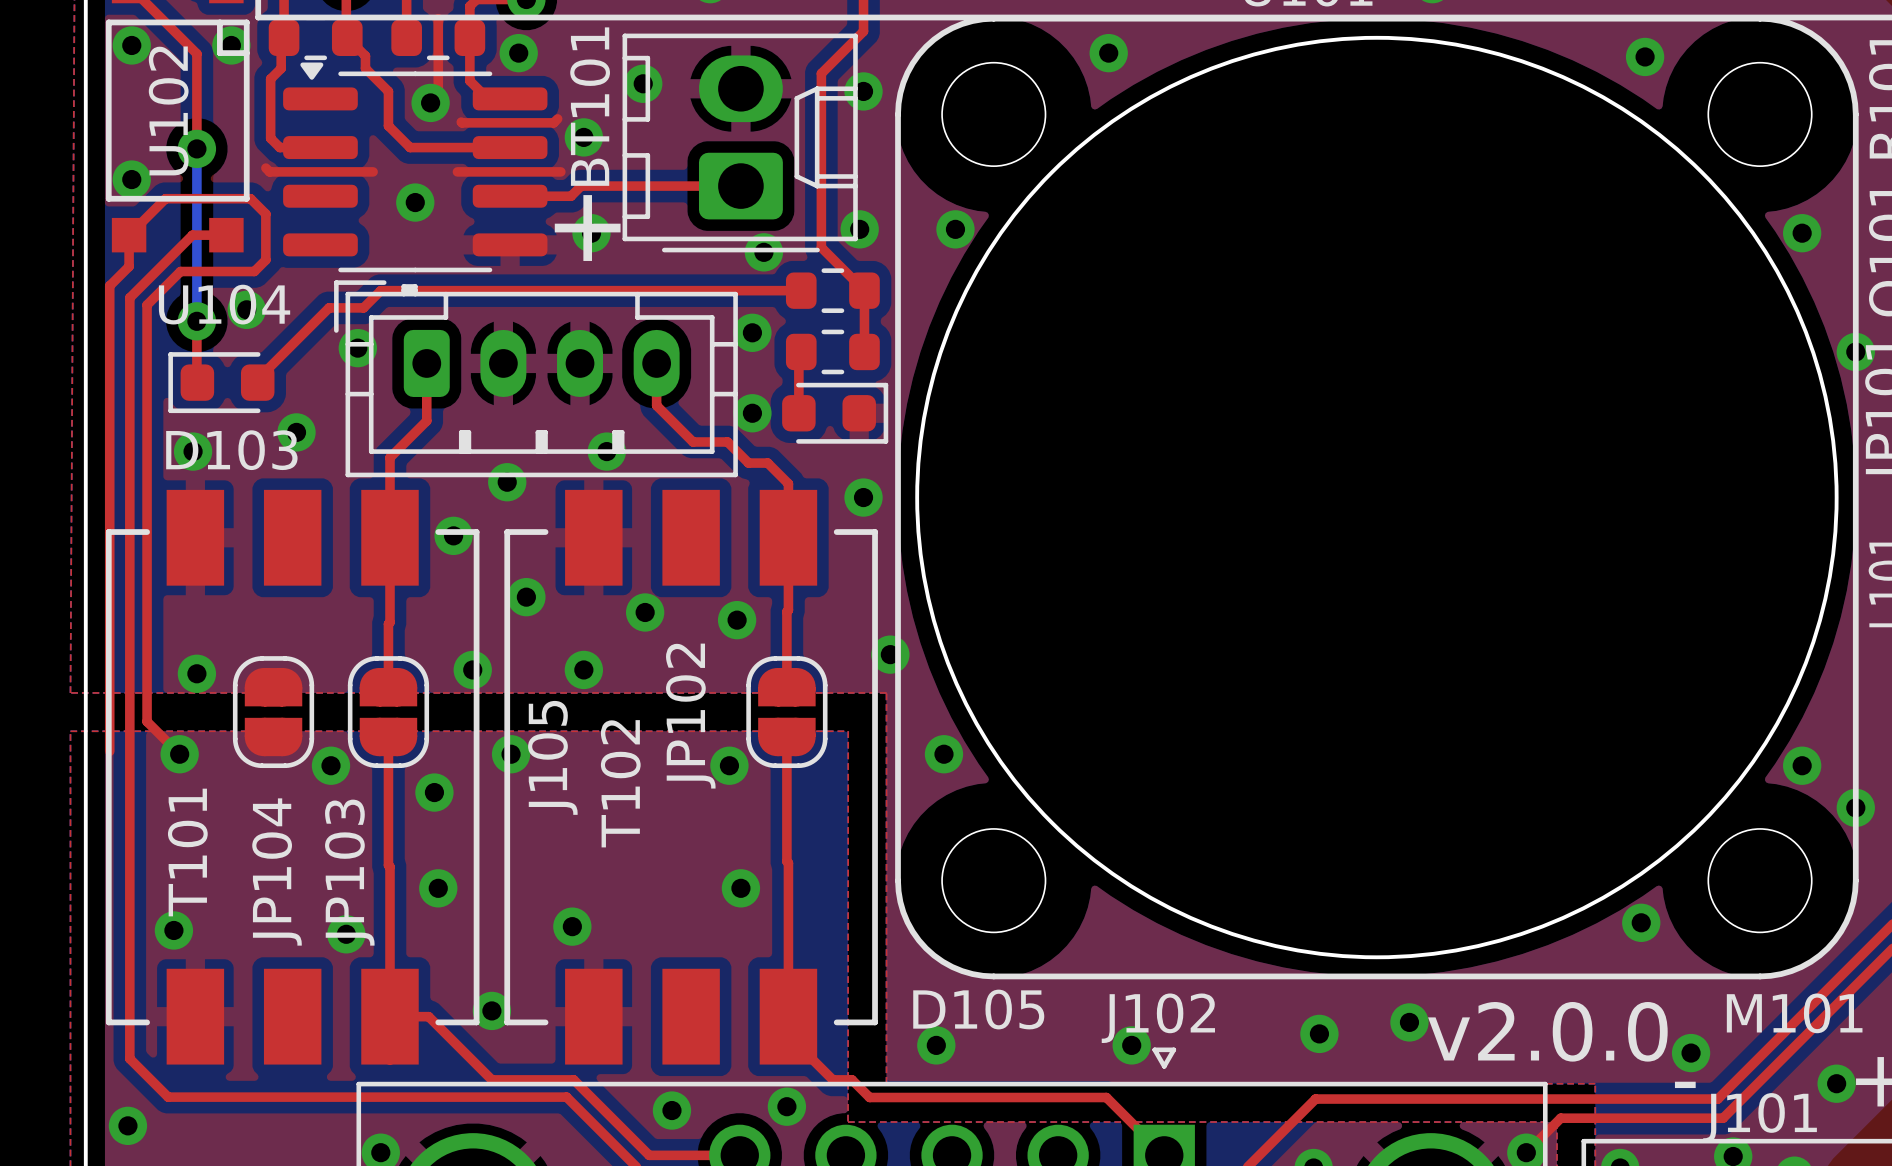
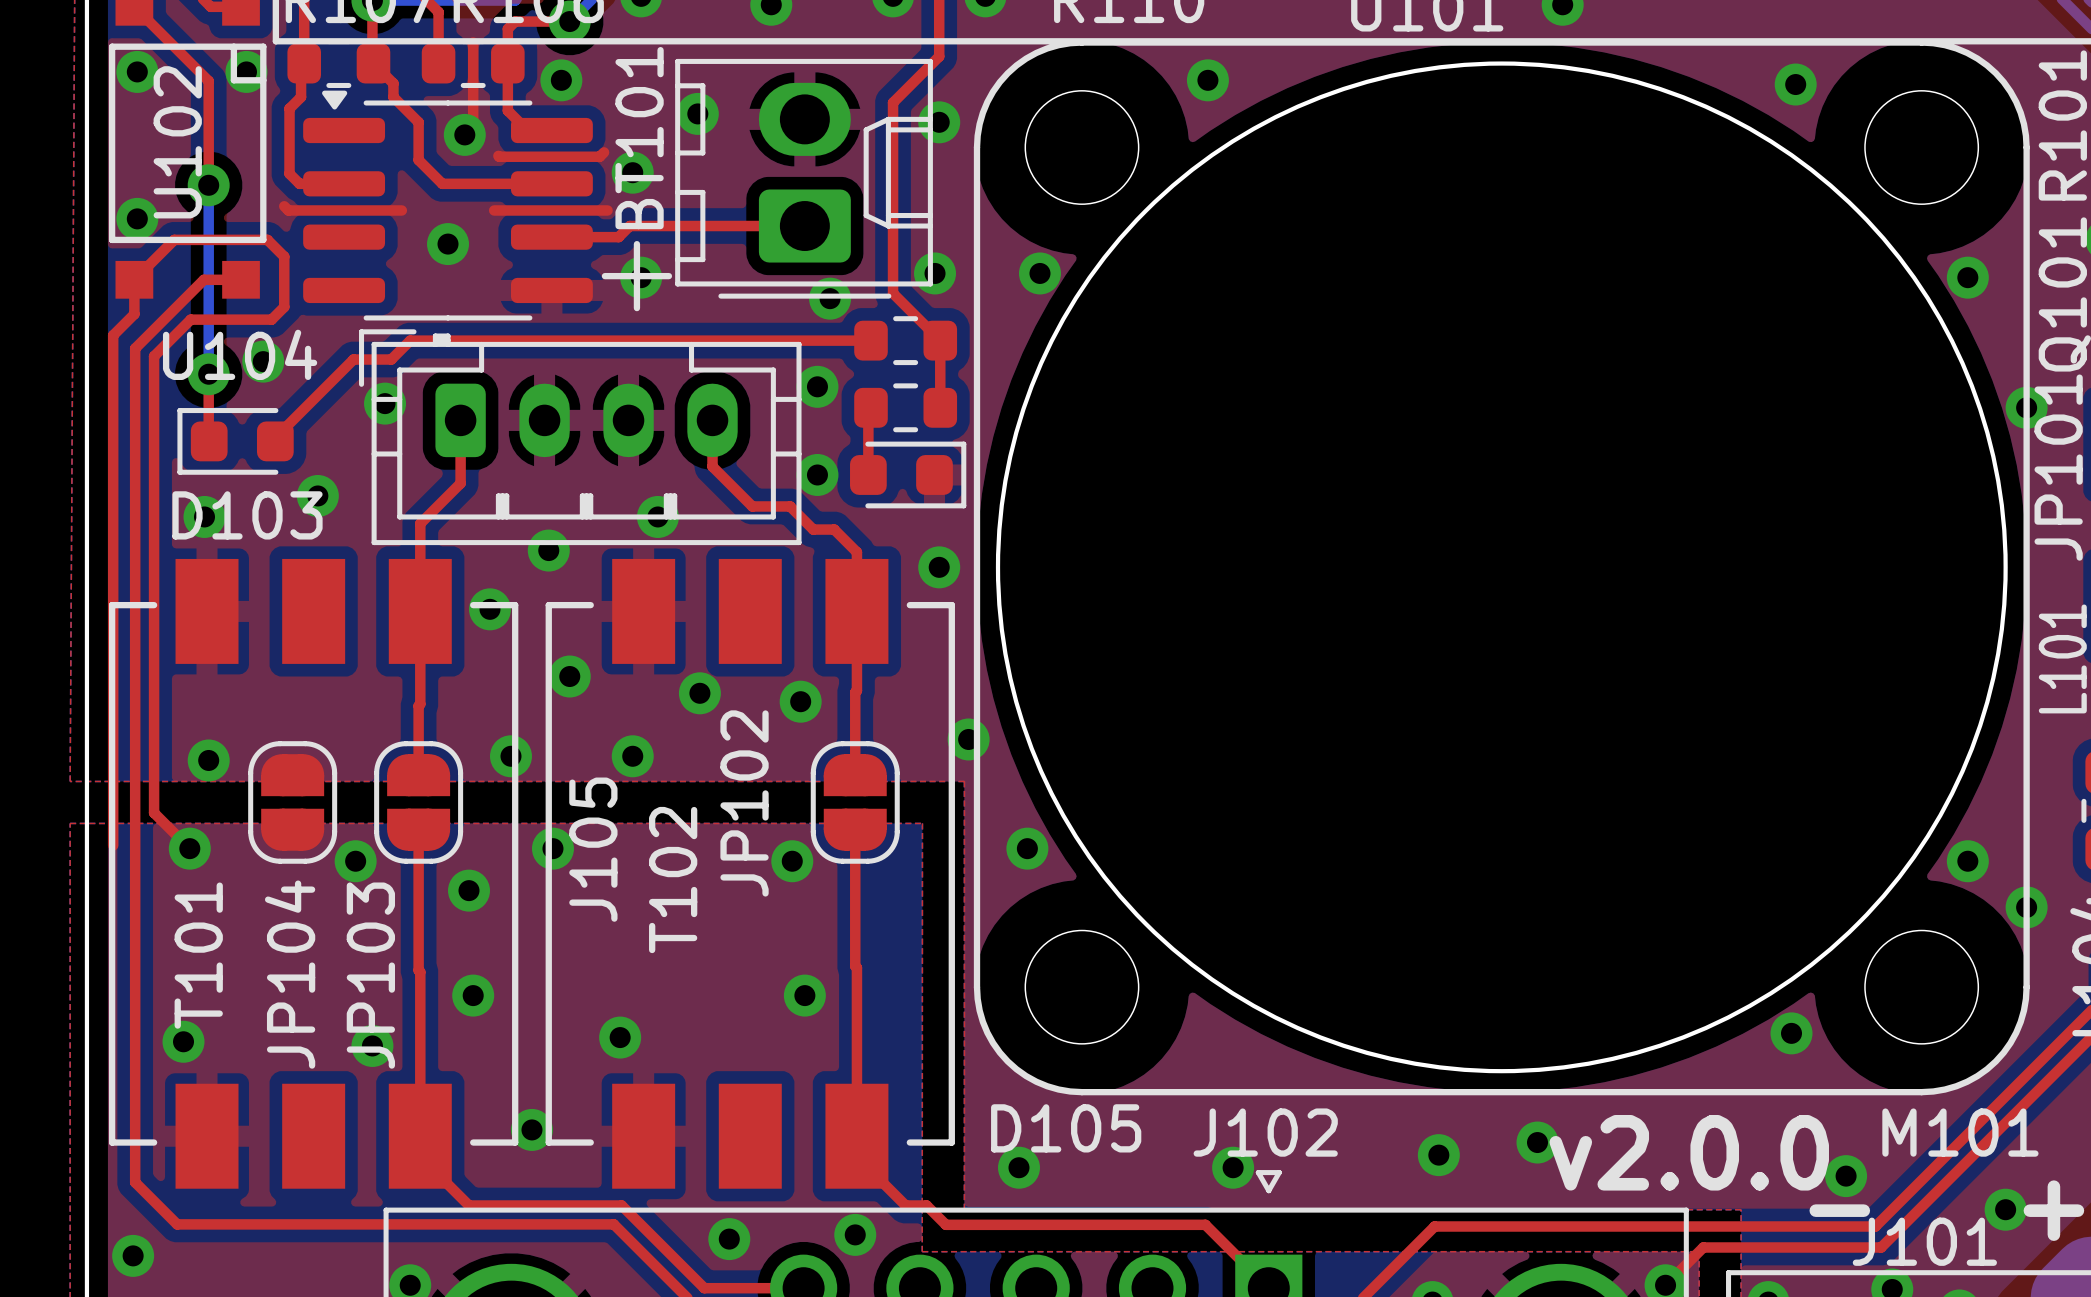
top track: (389, 1016) (428, 1016) (491, 1079) -> (420, 1156) (469, 1205) (531, 1205)

